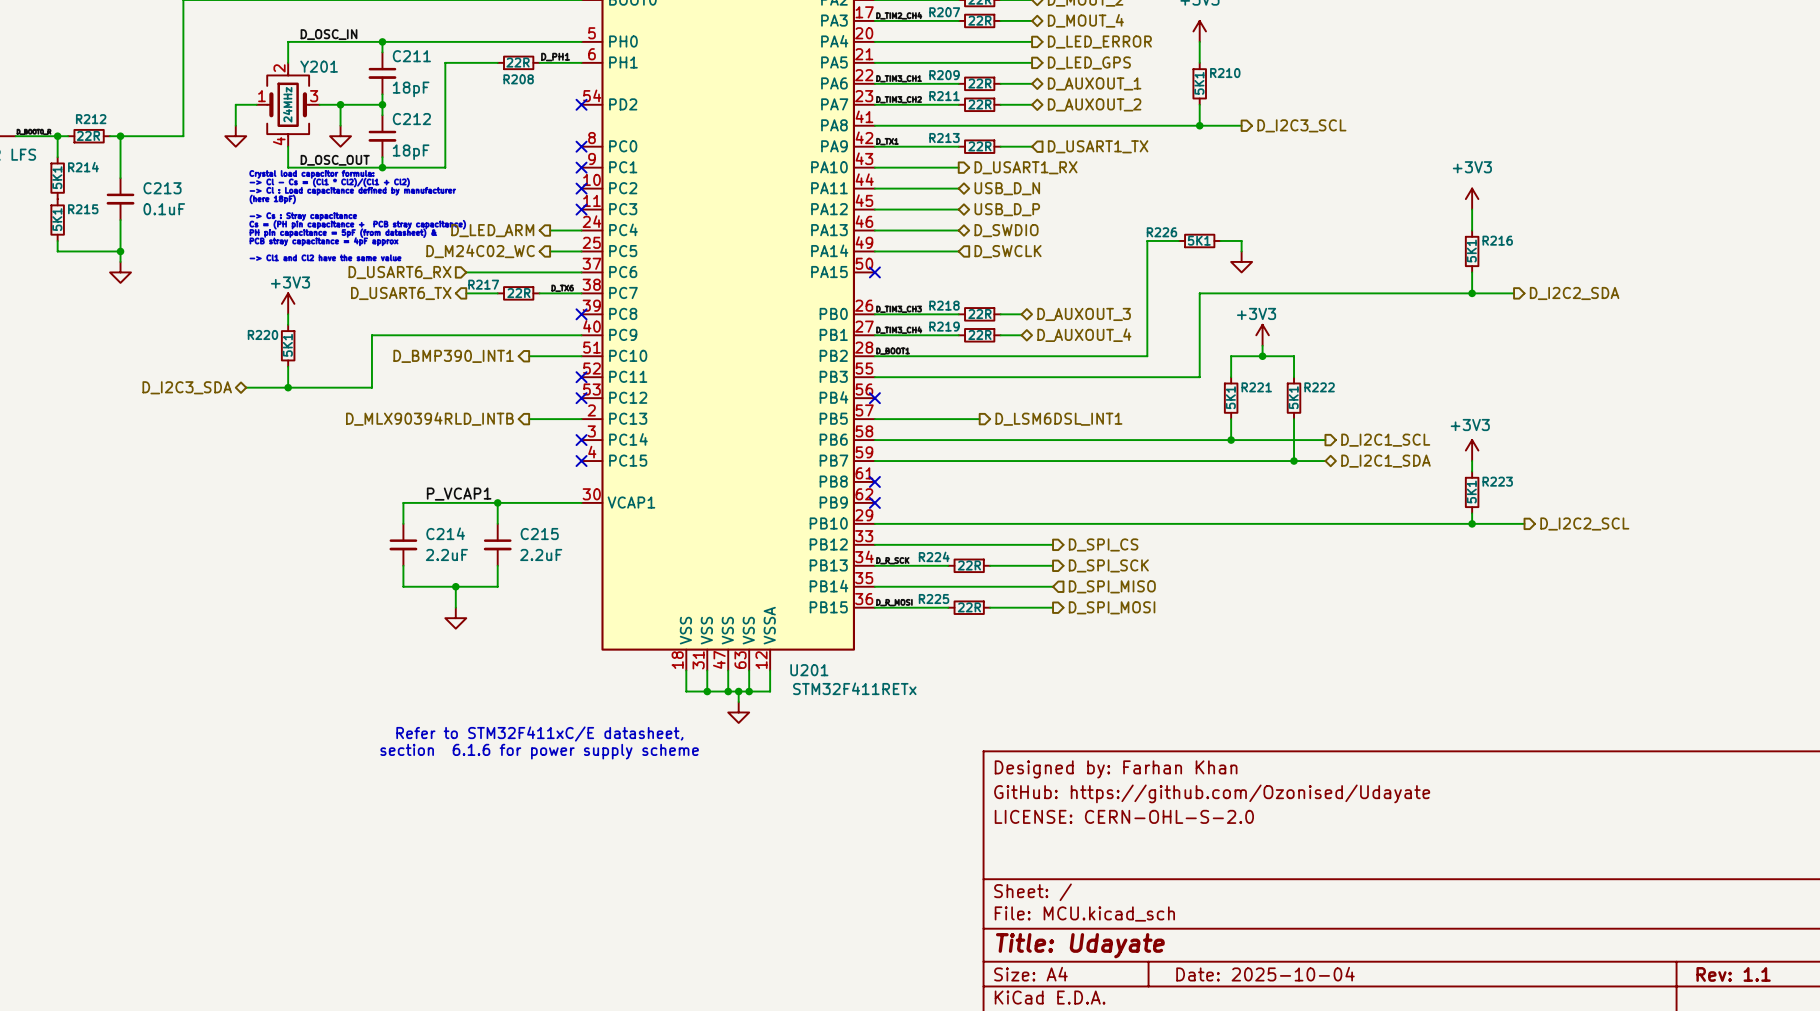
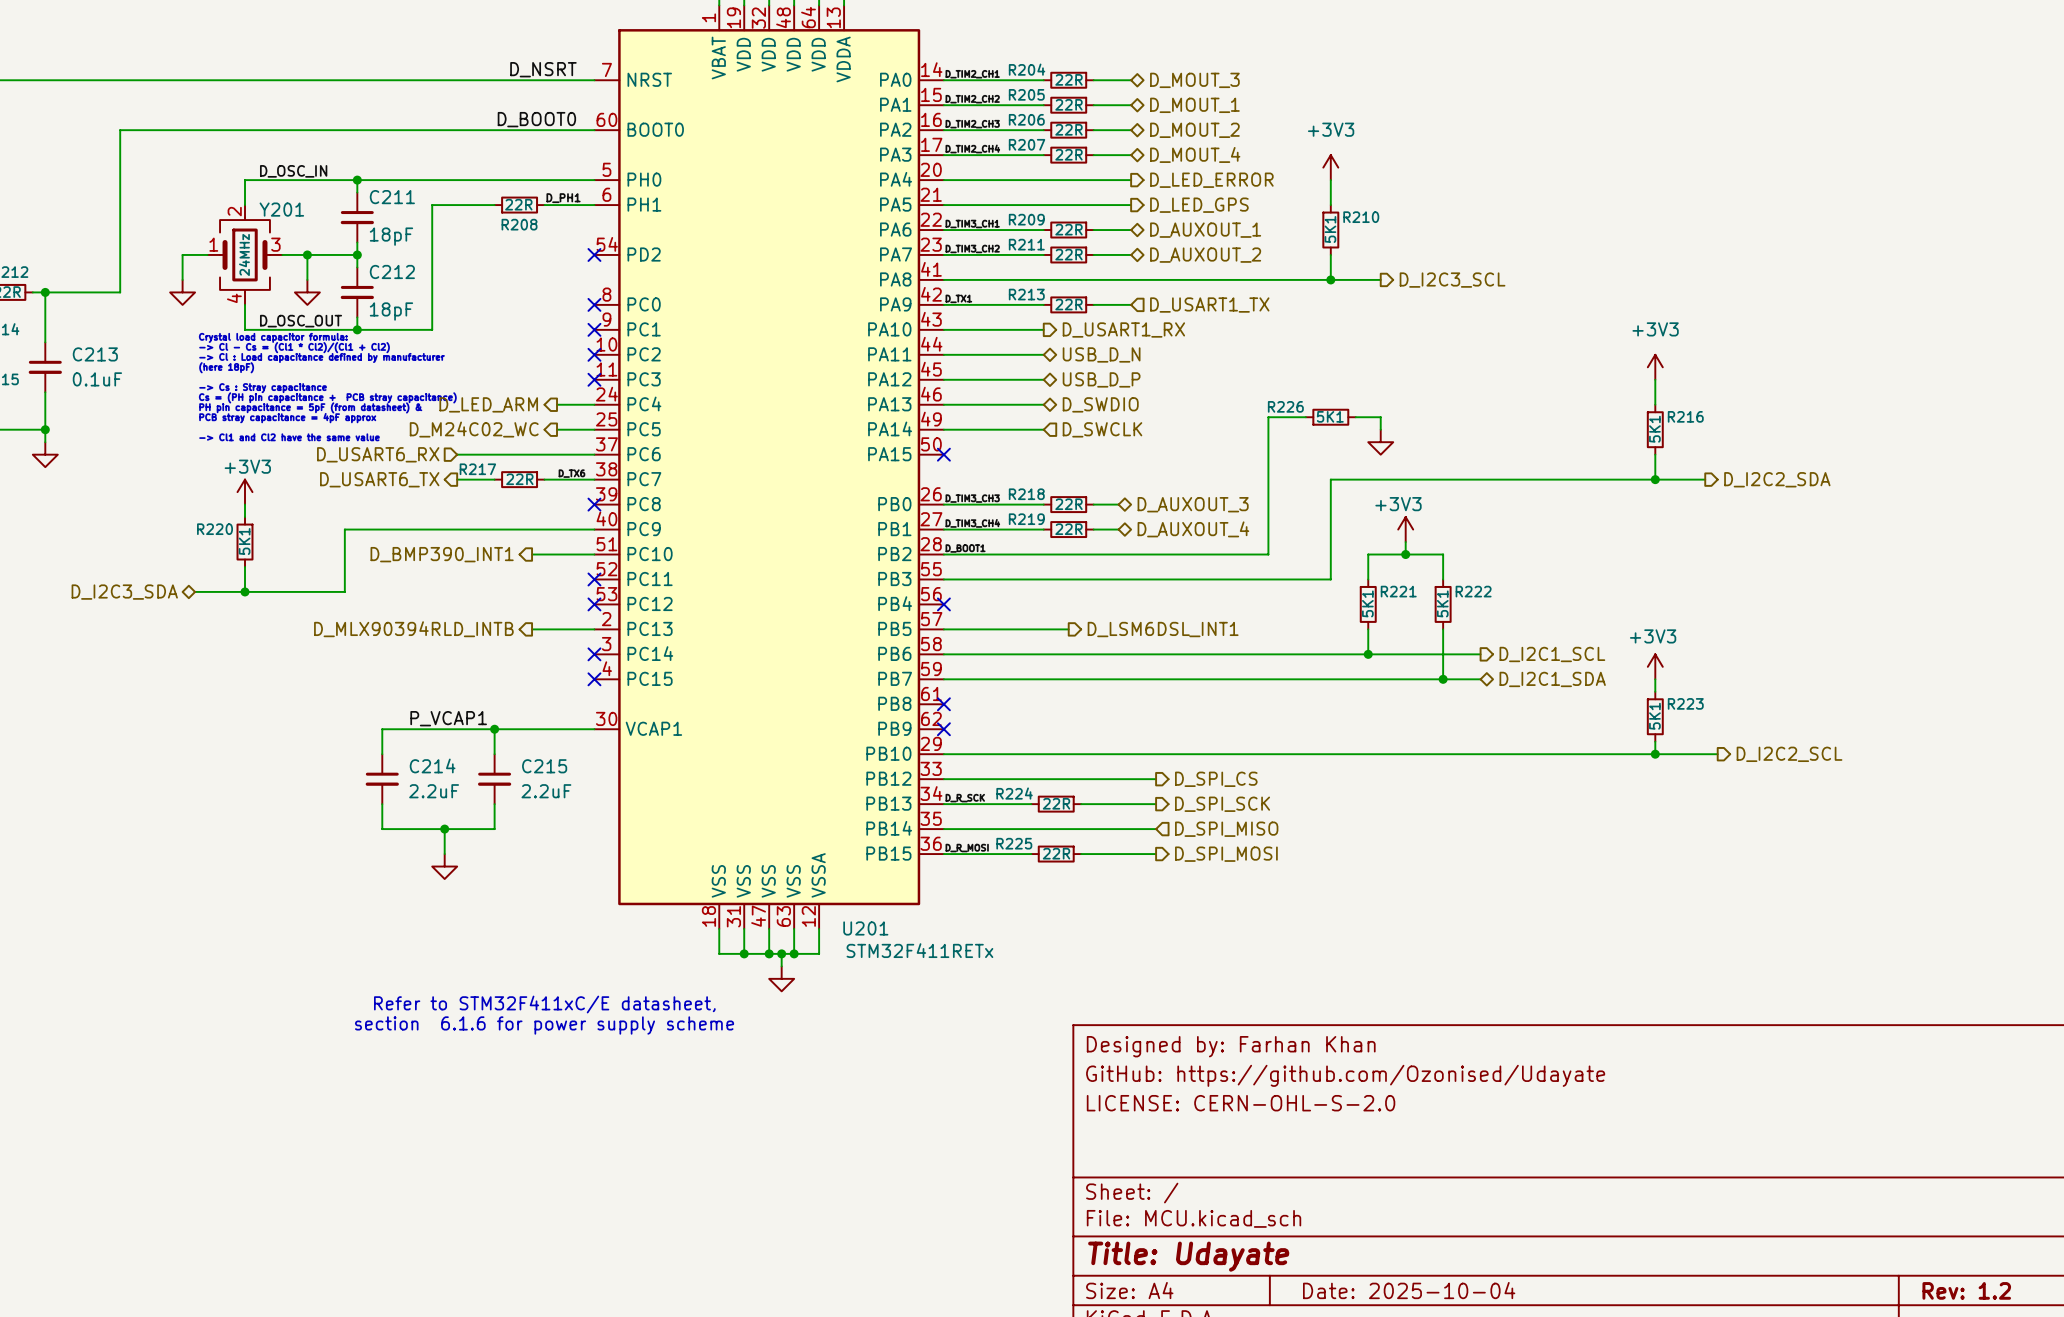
title block: Rev: 1.1 (1733, 974) -> Rev: 1.2 (1966, 1290)

